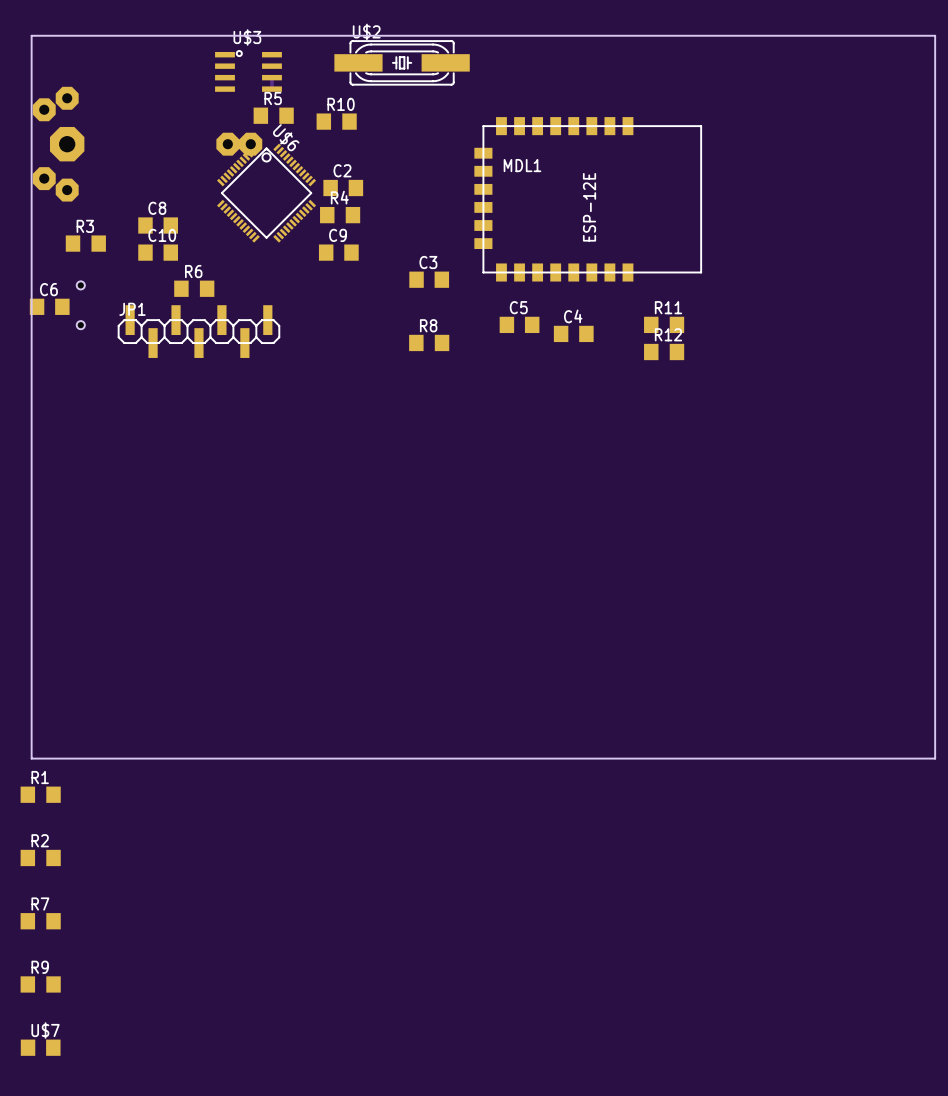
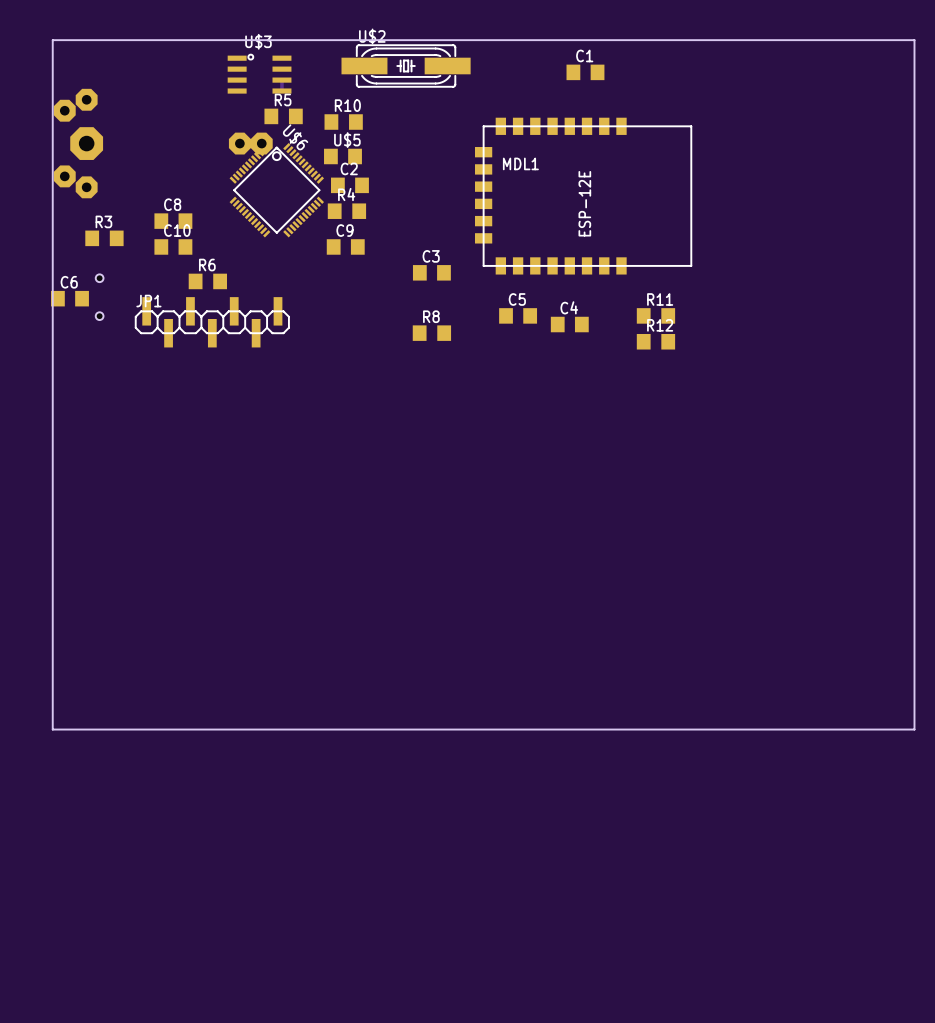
C1: none -> (585, 72)
U$5: none -> (342, 156)
R1: (40, 794) -> none
R2: (40, 857) -> none
R7: (40, 921) -> none
R9: (40, 984) -> none
U$7: (40, 1047) -> none

